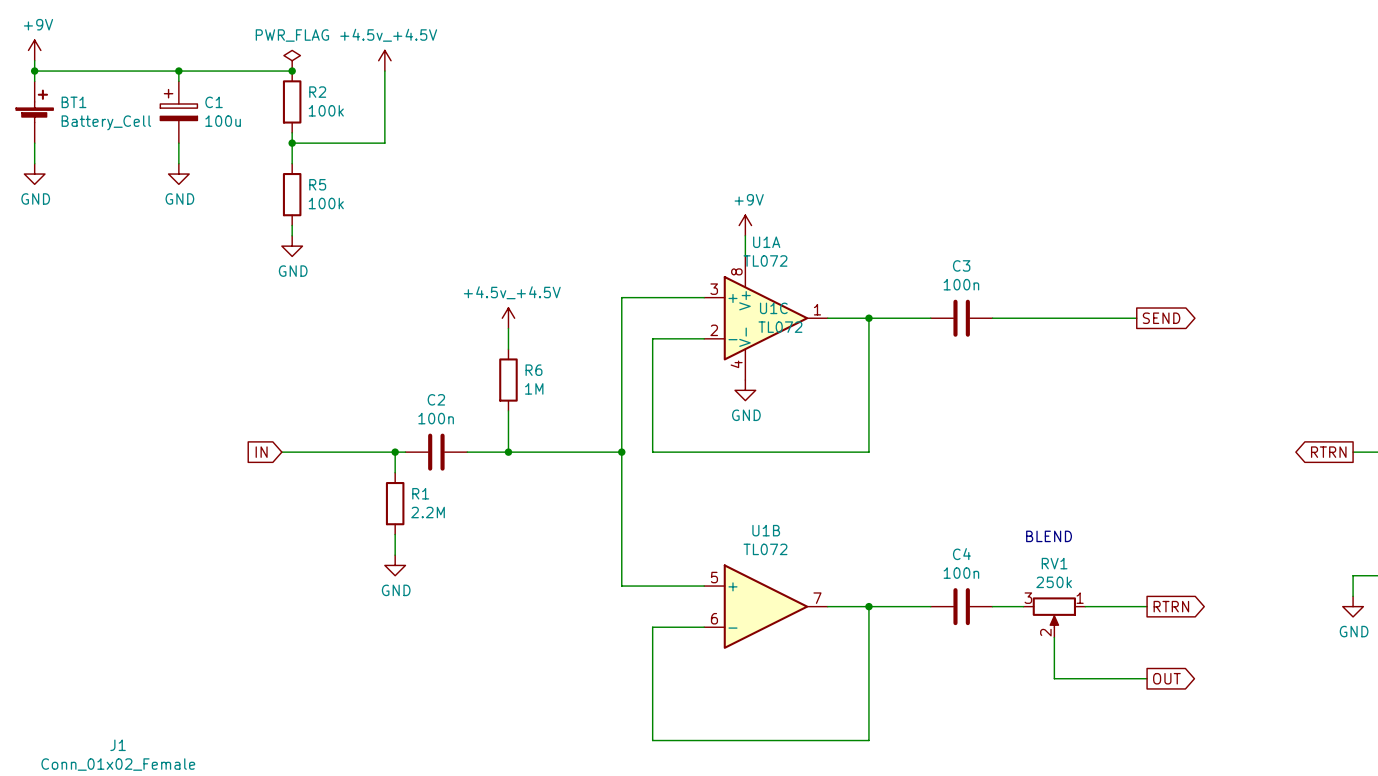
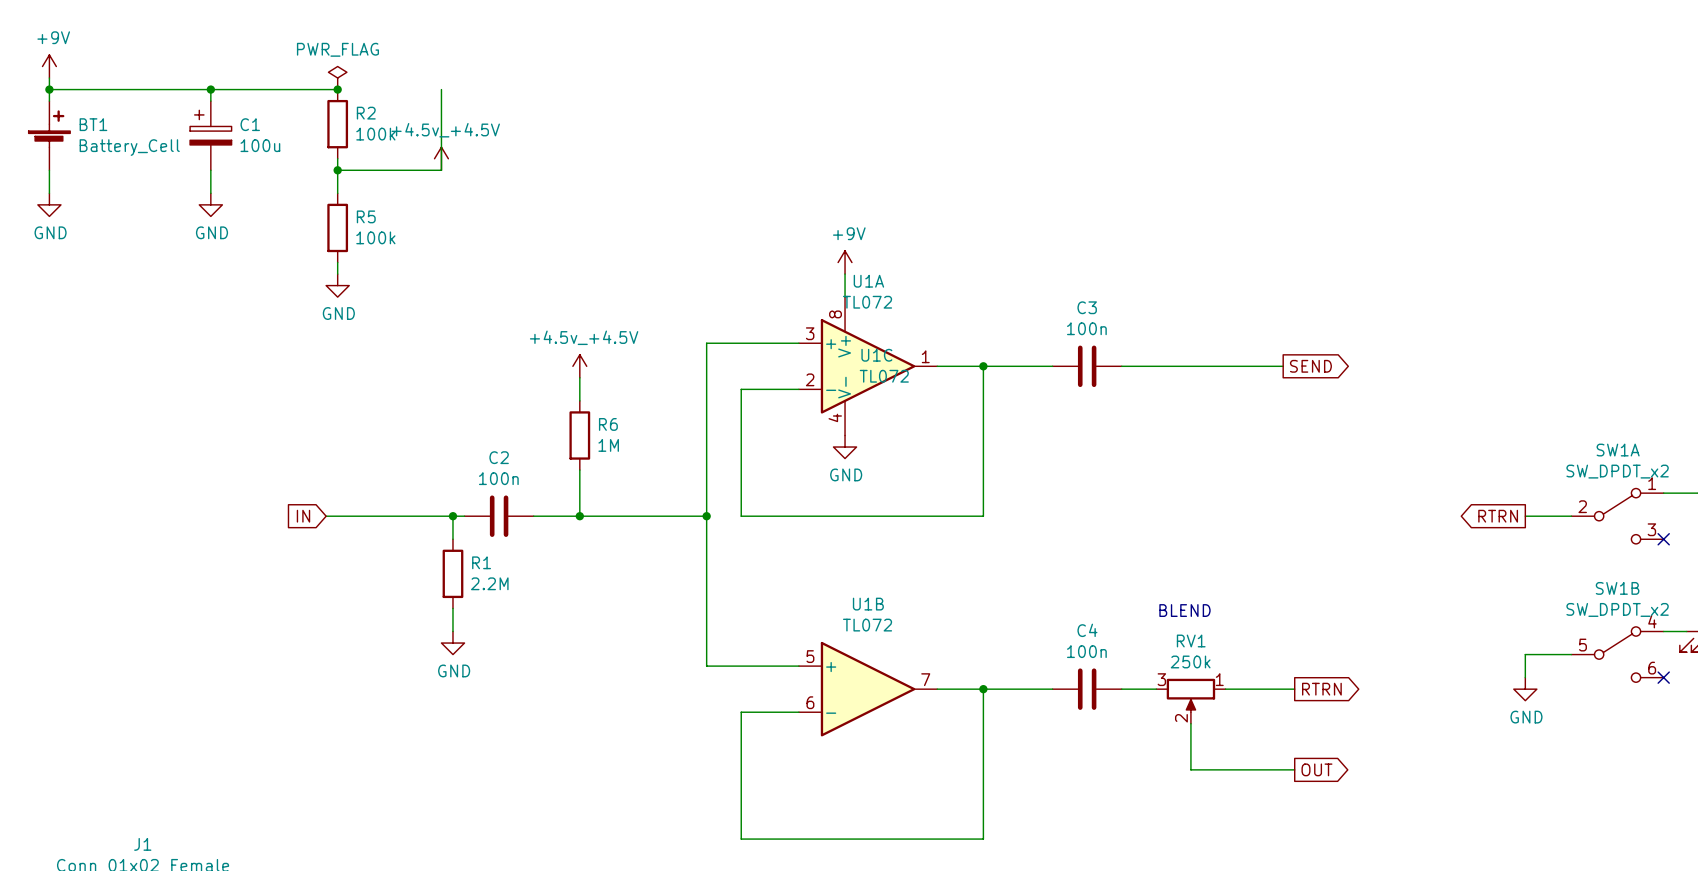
power symbol position: +4.5v_+4.5V (384, 60) -> +4.5v_+4.5V (441, 158)

